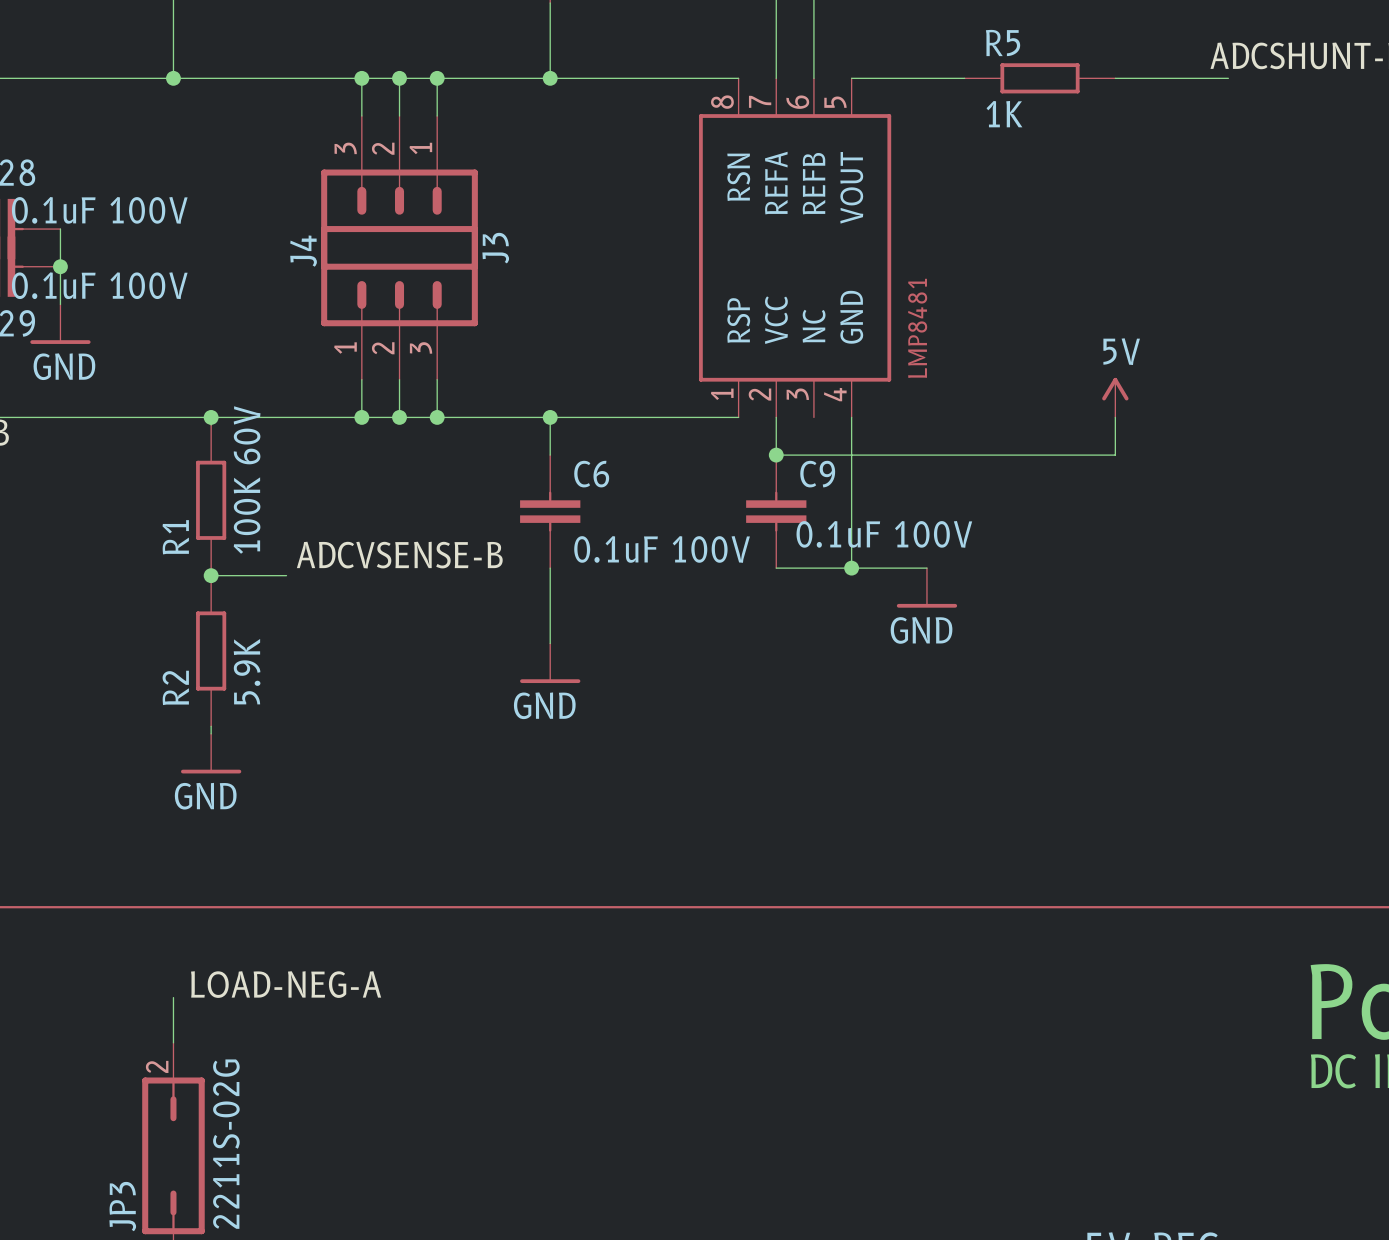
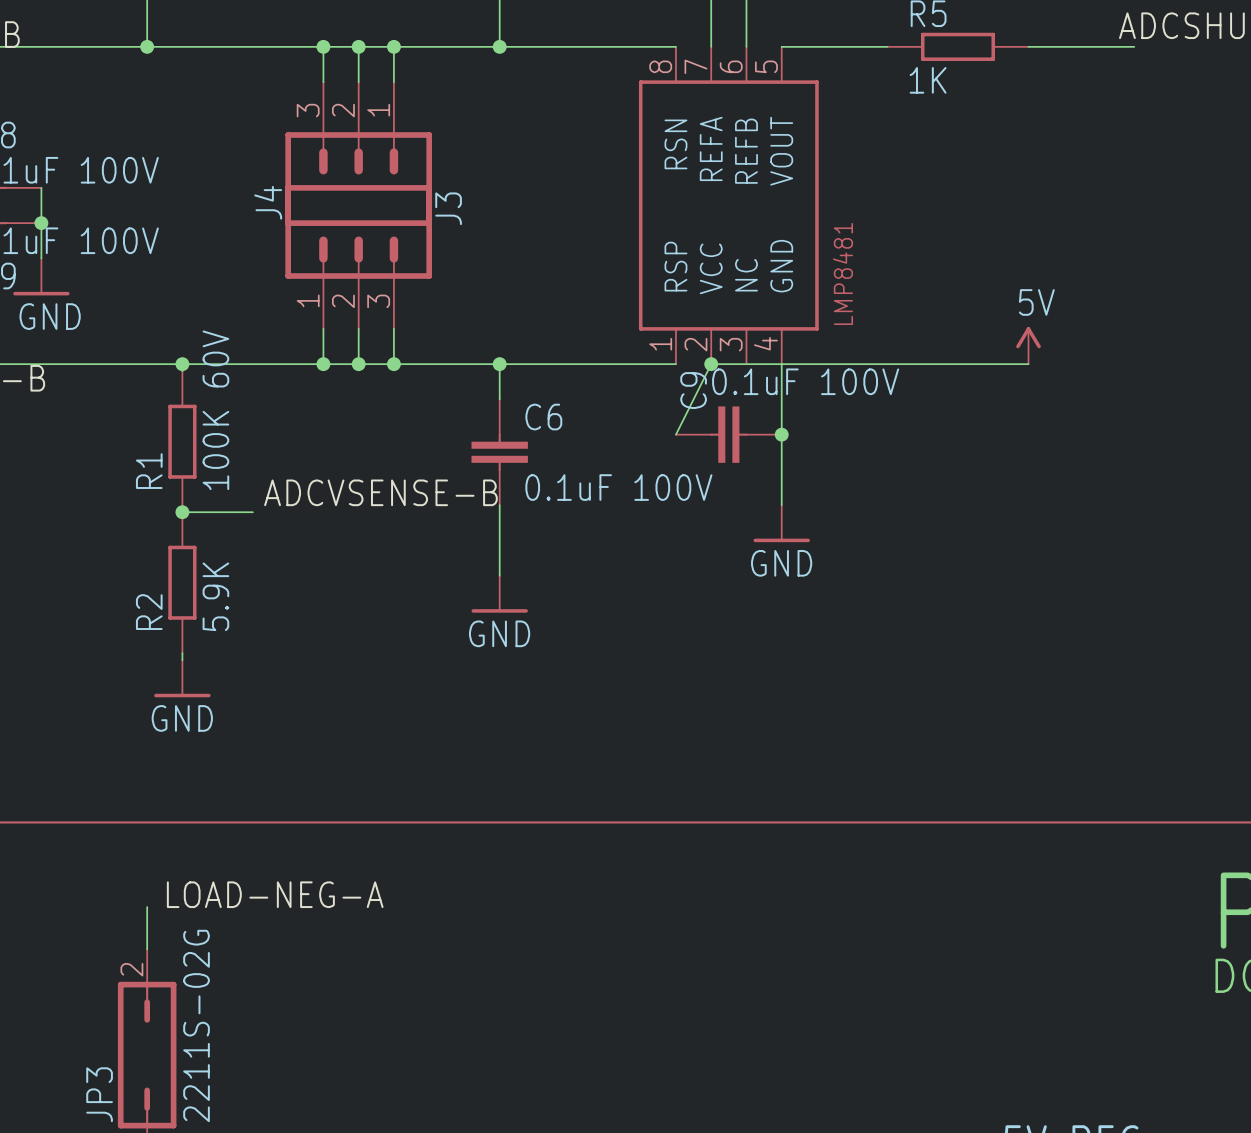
wire: (776, 417) (776, 455) (1115, 455) (1115, 417) -> (675, 434) (711, 364) (1028, 364)
junction position: (776, 455) -> (711, 364)
C9 name position: C9 (817, 474) -> C9 (693, 390)
junction: none -> (781, 434)
C9 rotation: 0° (776, 511) -> 90° clockwise (728, 434)
C9 value position: 0.1uF 100V (884, 534) -> 0.1uF 100V (805, 381)
wire: (776, 568) (926, 568) -> none
junction: (851, 568) -> none
power symbol position: GND (926, 587) -> GND (781, 523)

